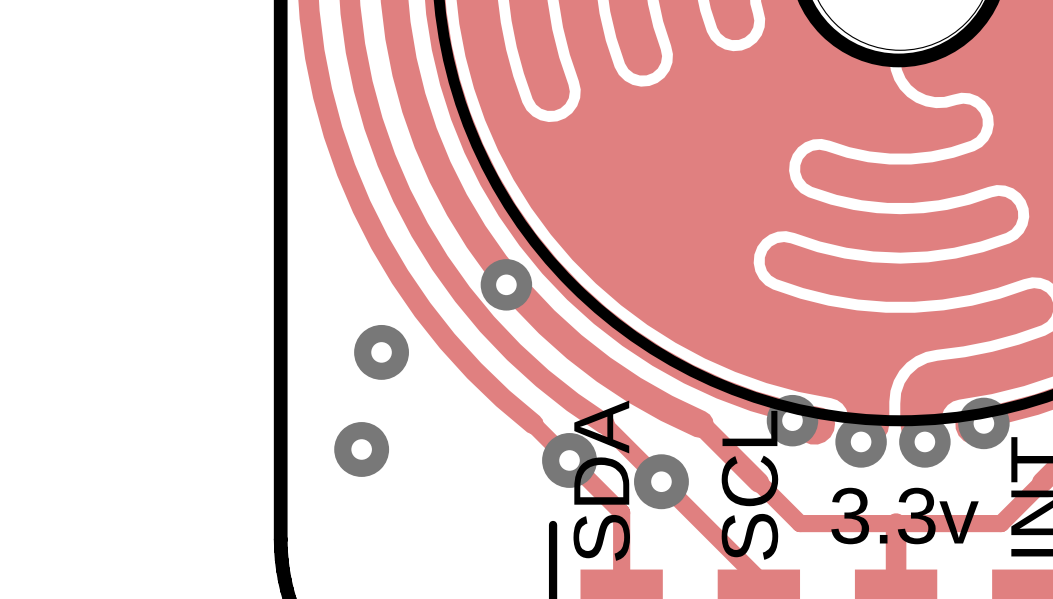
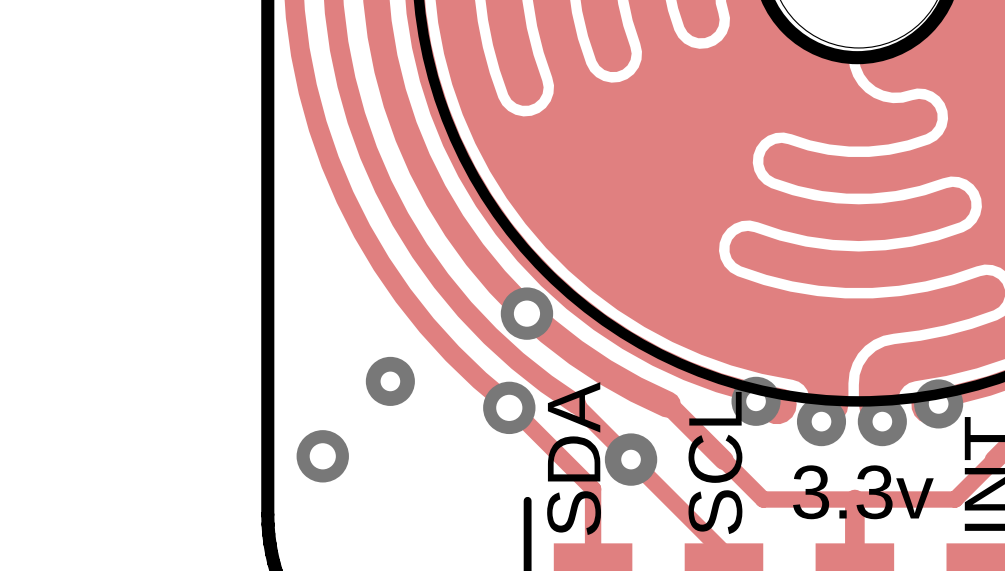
via position: (506, 284) -> (390, 381)
via: none -> (526, 313)
via: (381, 352) -> none
via position: (361, 449) -> (322, 456)
via position: (569, 460) -> (509, 407)

